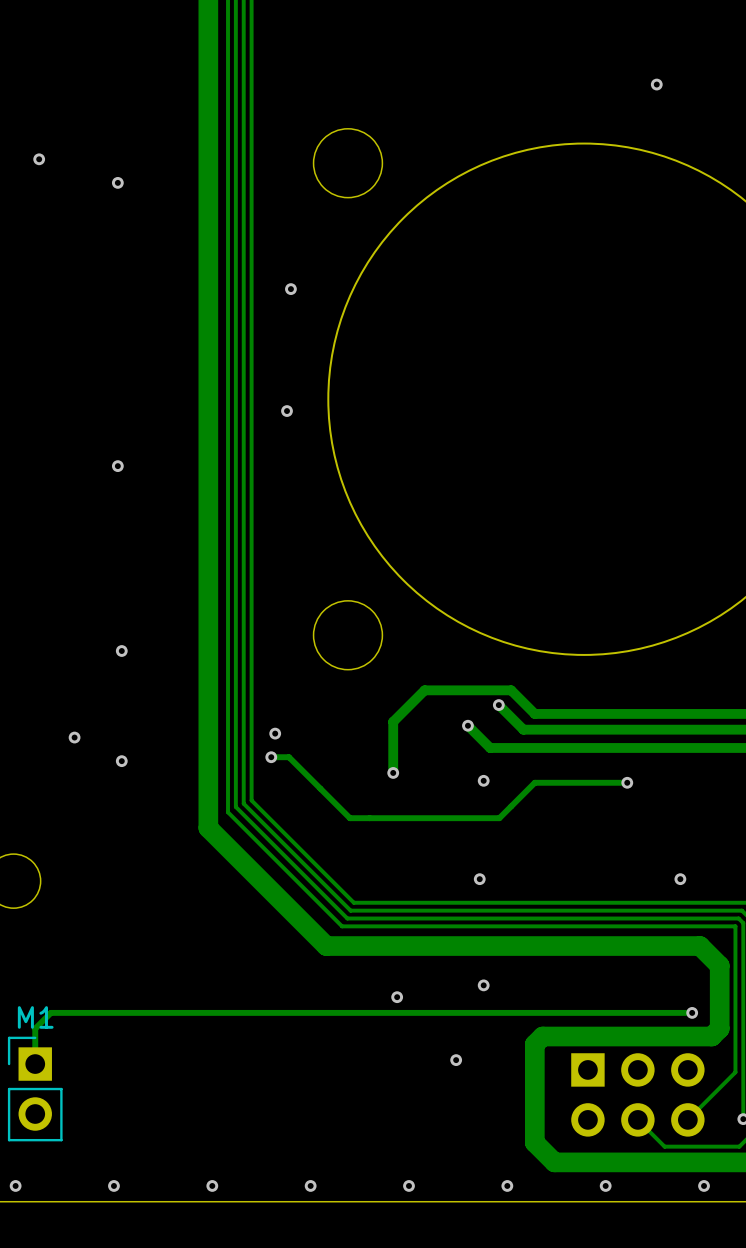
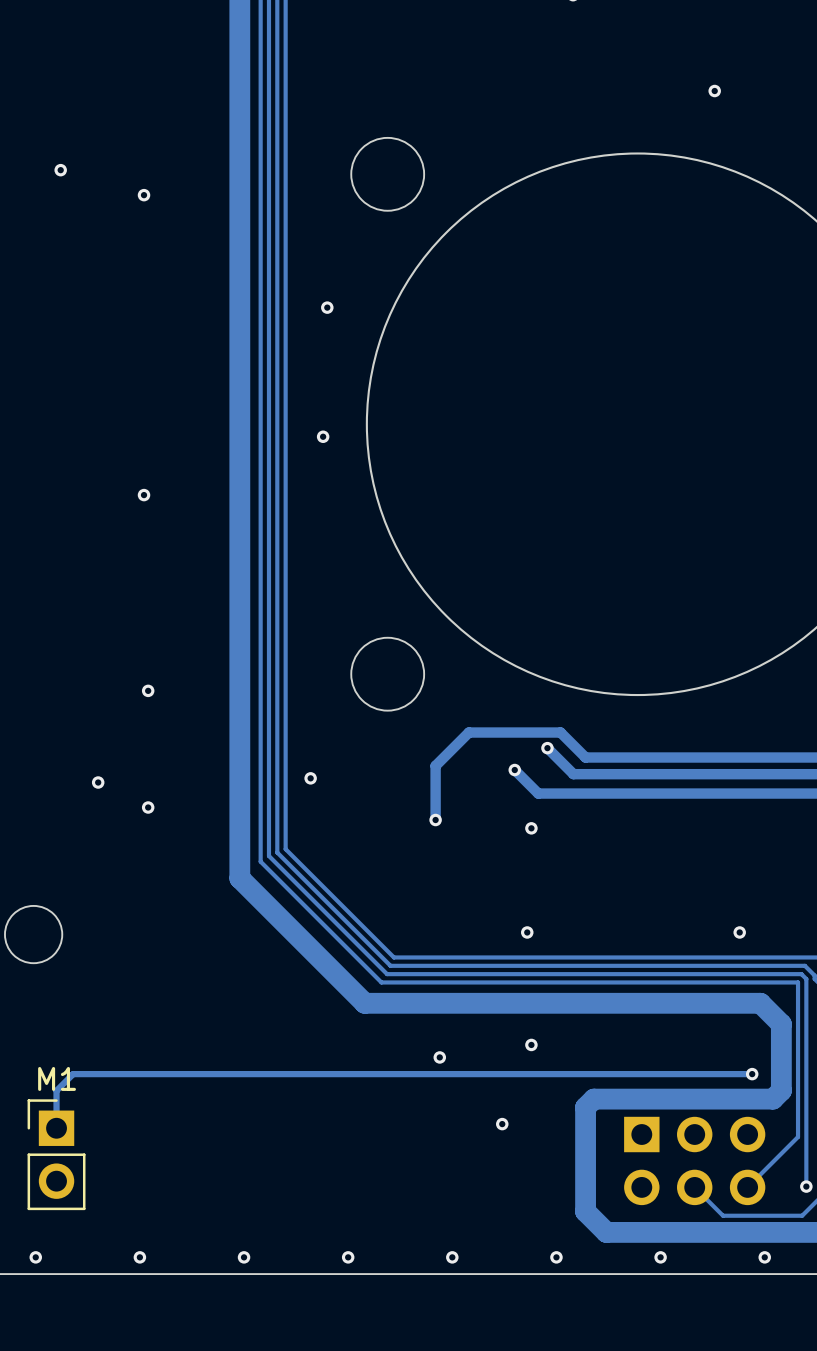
track: (271, 757) (288, 757) (349, 818) (499, 818) (534, 782) (627, 782) -> none
via: (271, 757) -> none
via: (627, 782) -> none

